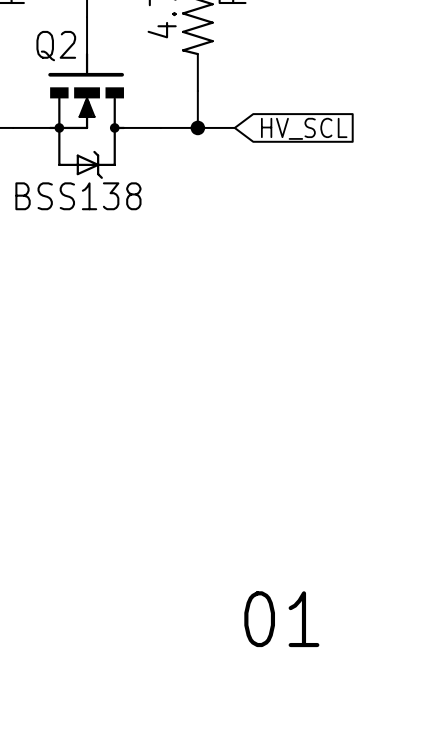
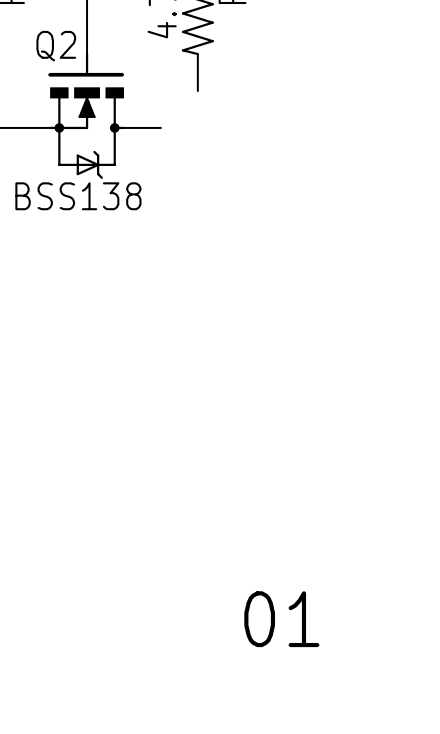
wire: (197, 91) (197, 127) -> none
wire: (160, 127) (234, 127) -> none
junction: (197, 127) -> none
global label: HV_SCL (304, 128) -> none

